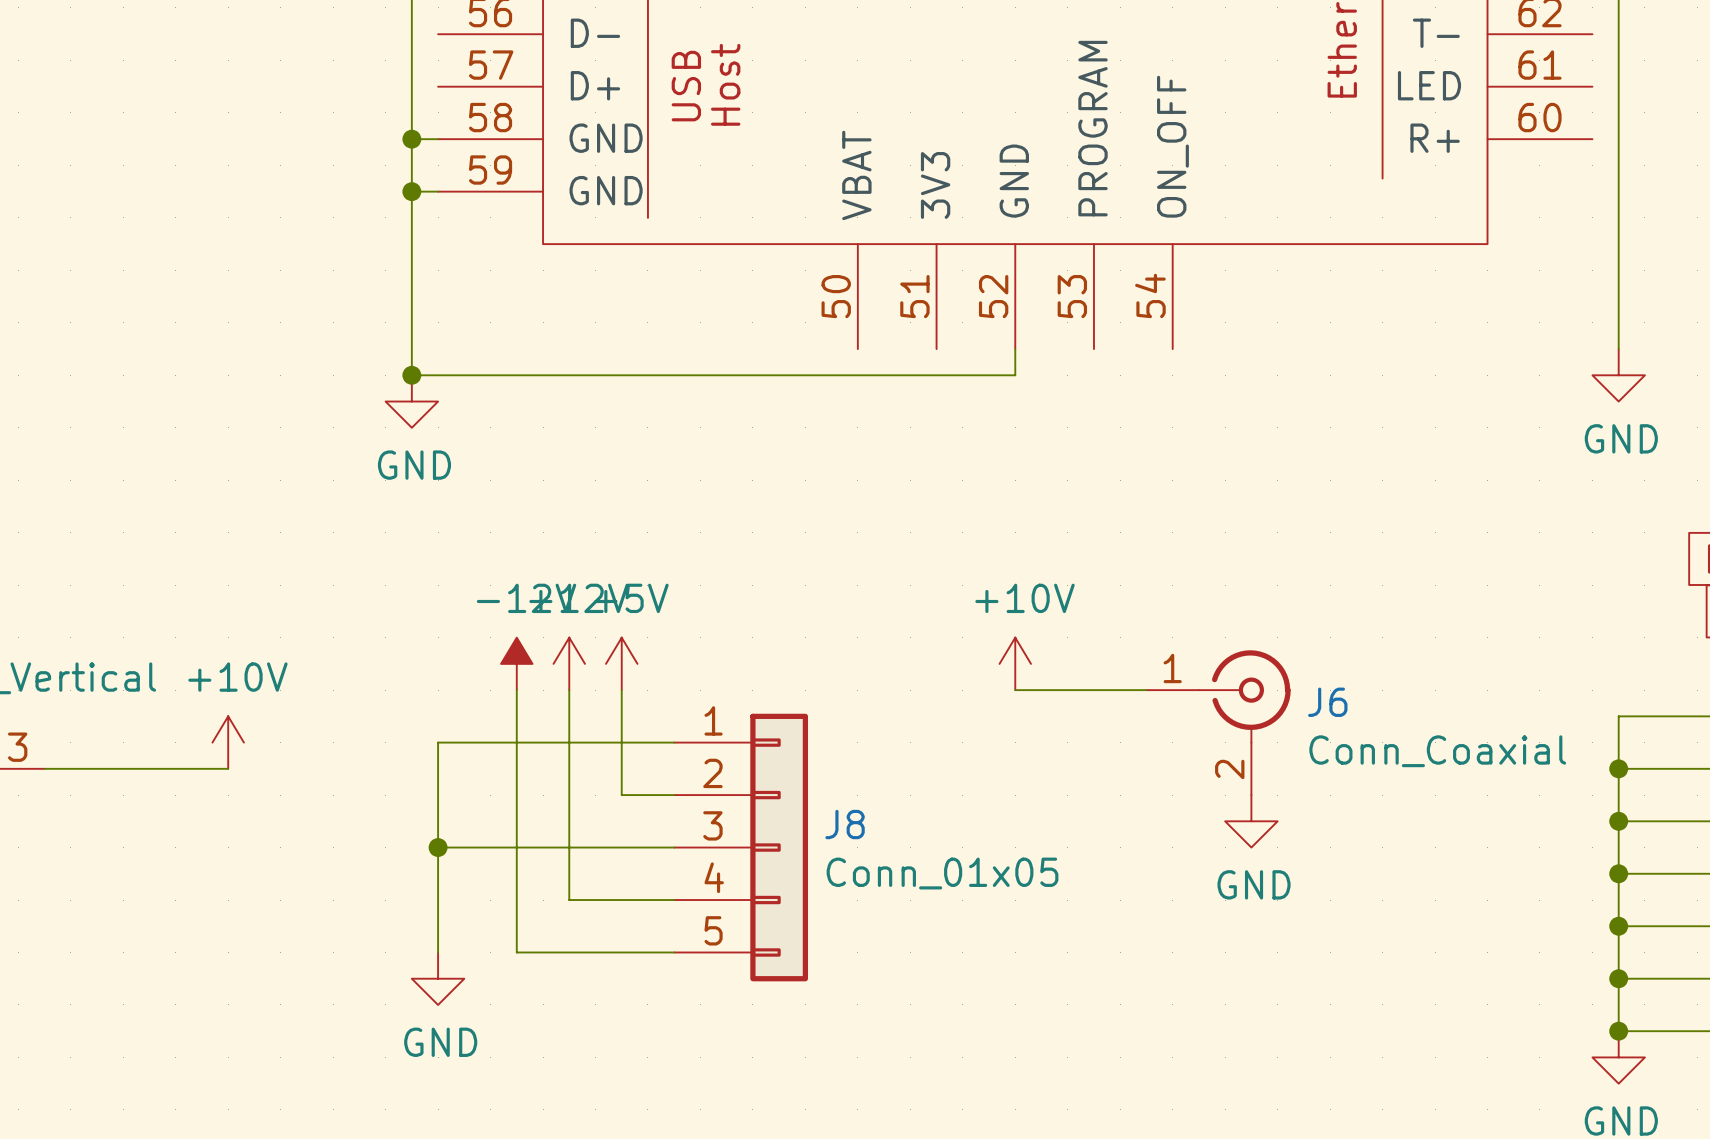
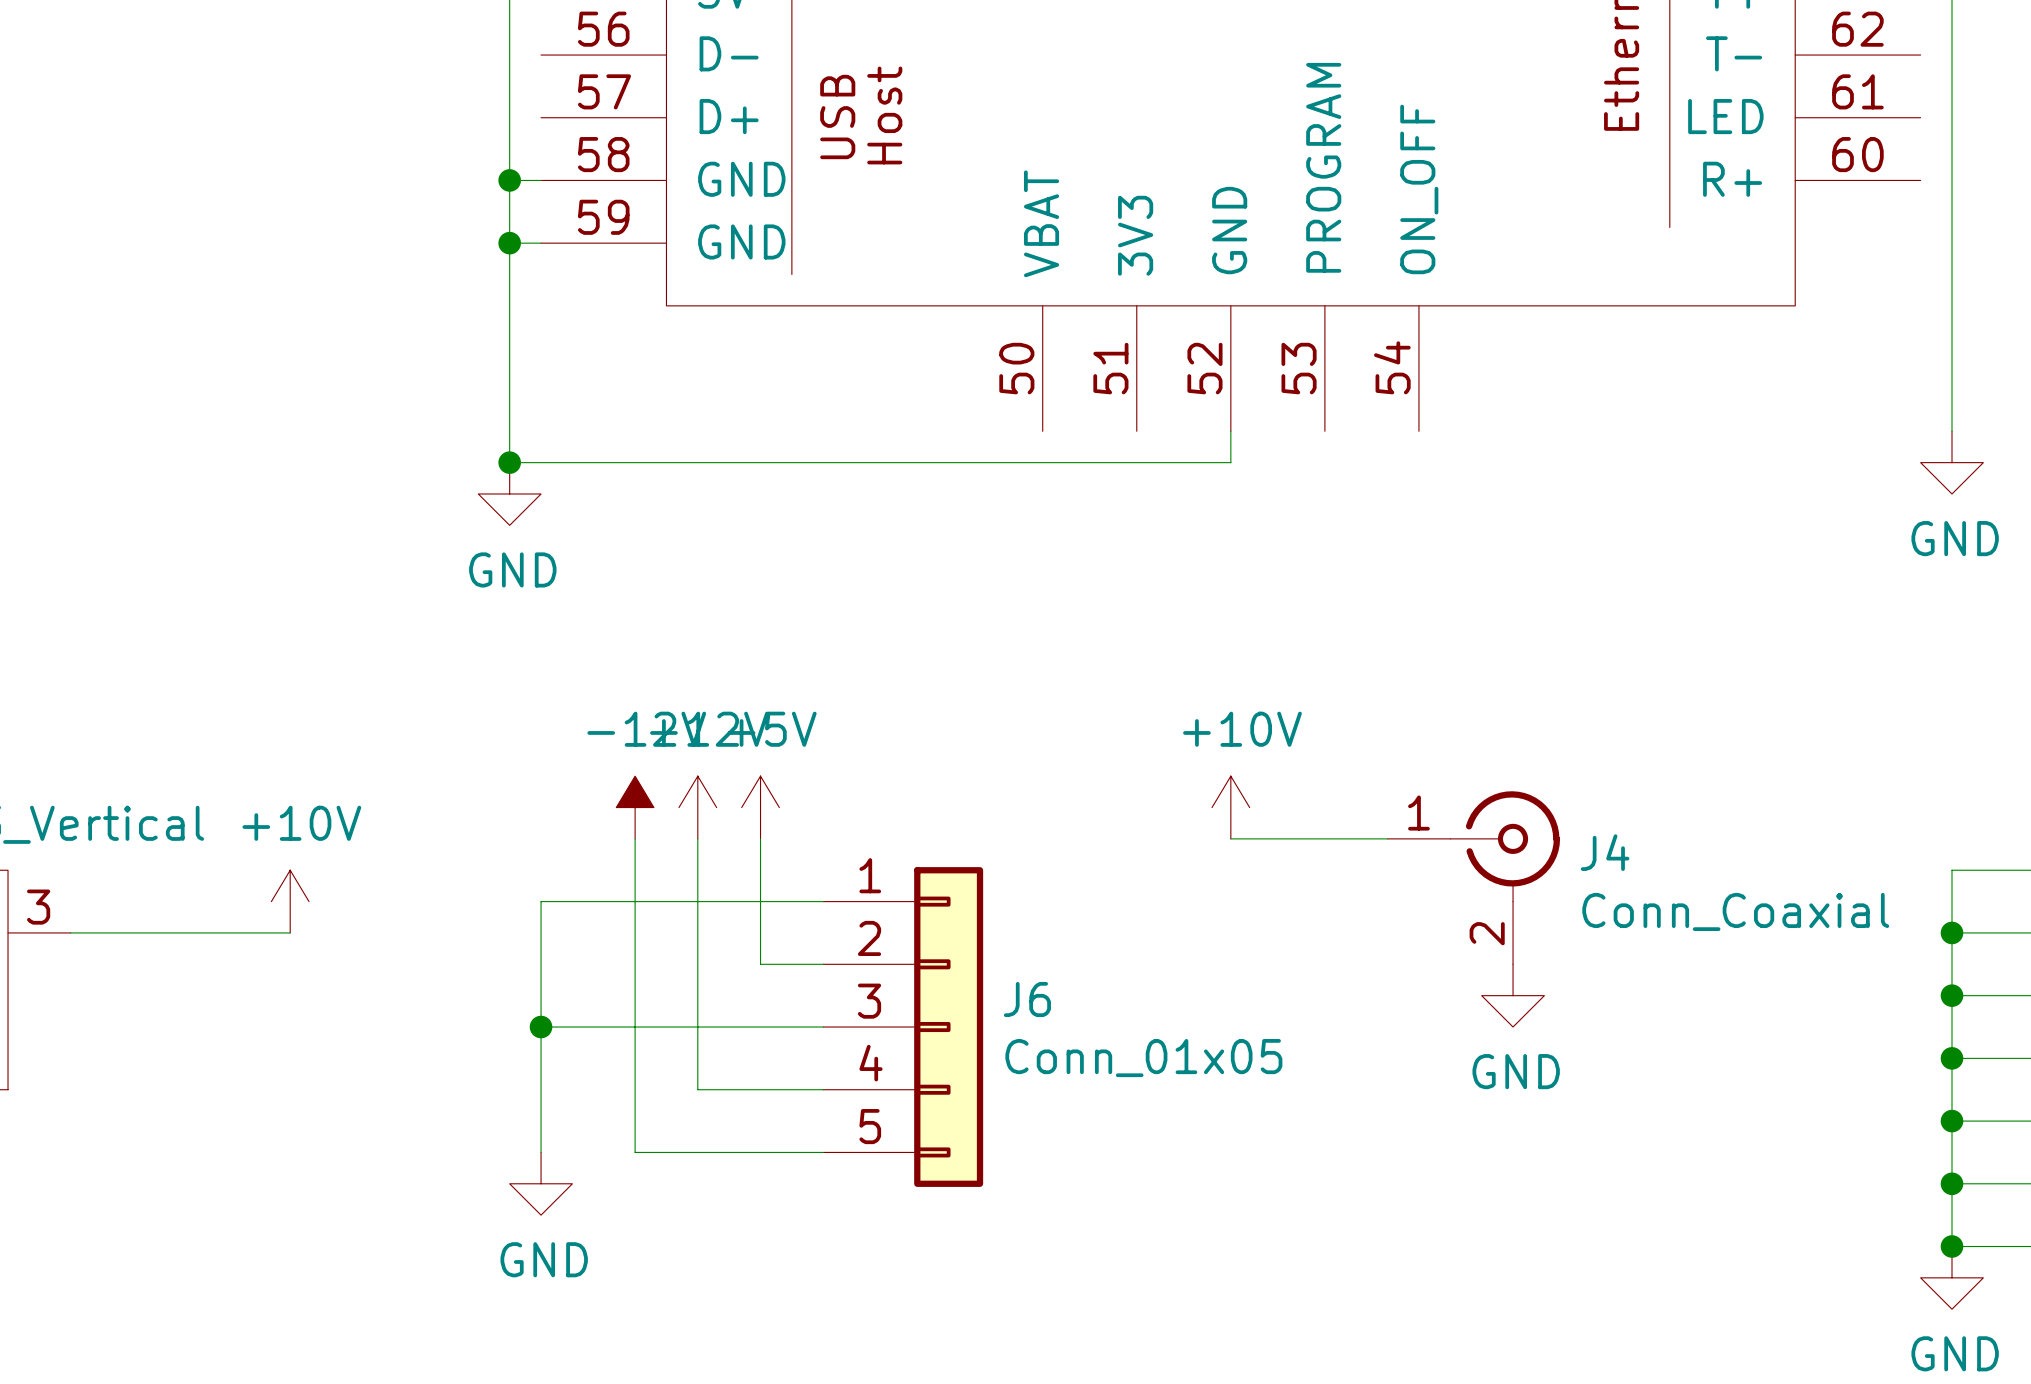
J6 name: J6 (1327, 702) -> J4 (1605, 852)
J8 name: J8 (845, 824) -> J6 (1027, 999)

